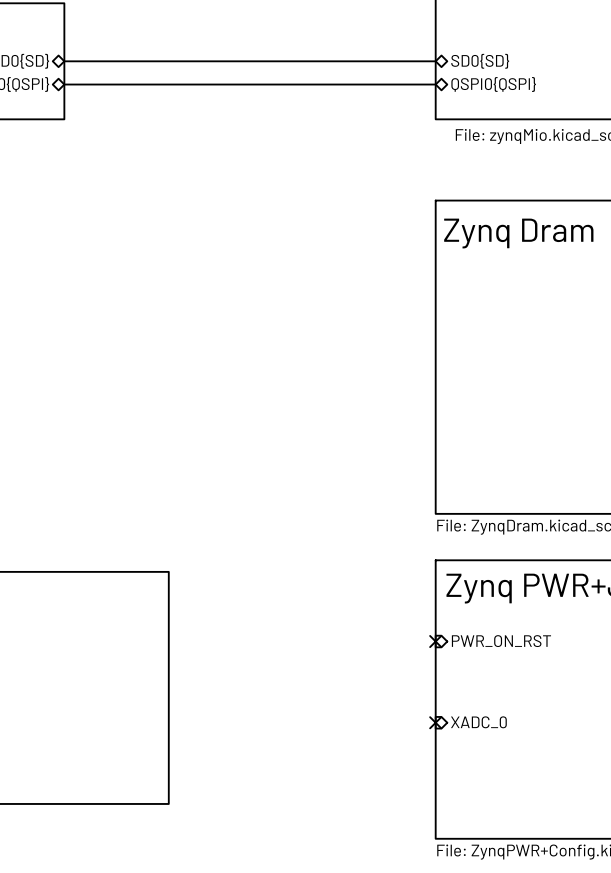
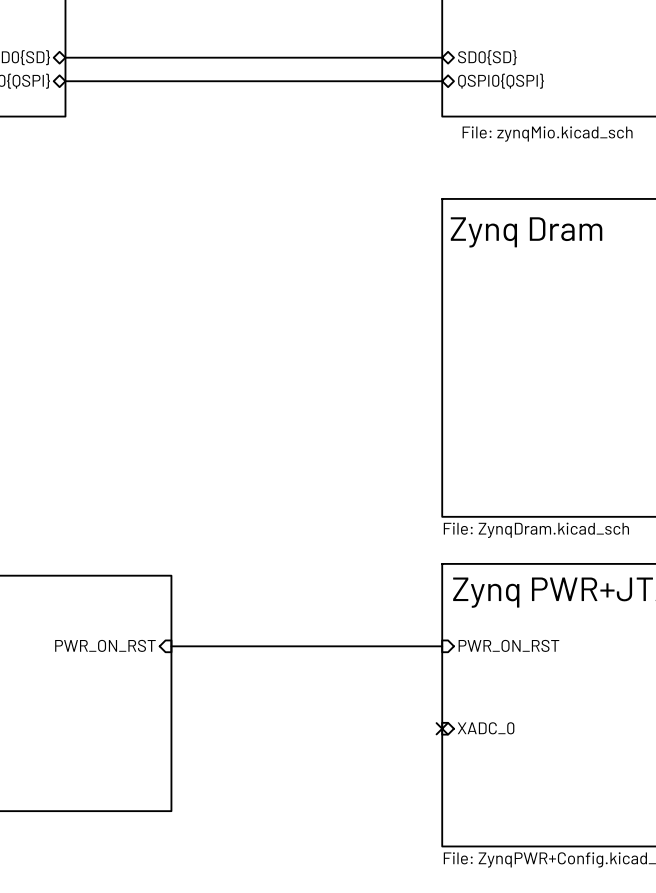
sheet pin: none -> PWR_ON_RST (105, 645)
wire: none -> (171, 646) (442, 646)
no-connect mark: (435, 641) -> none

